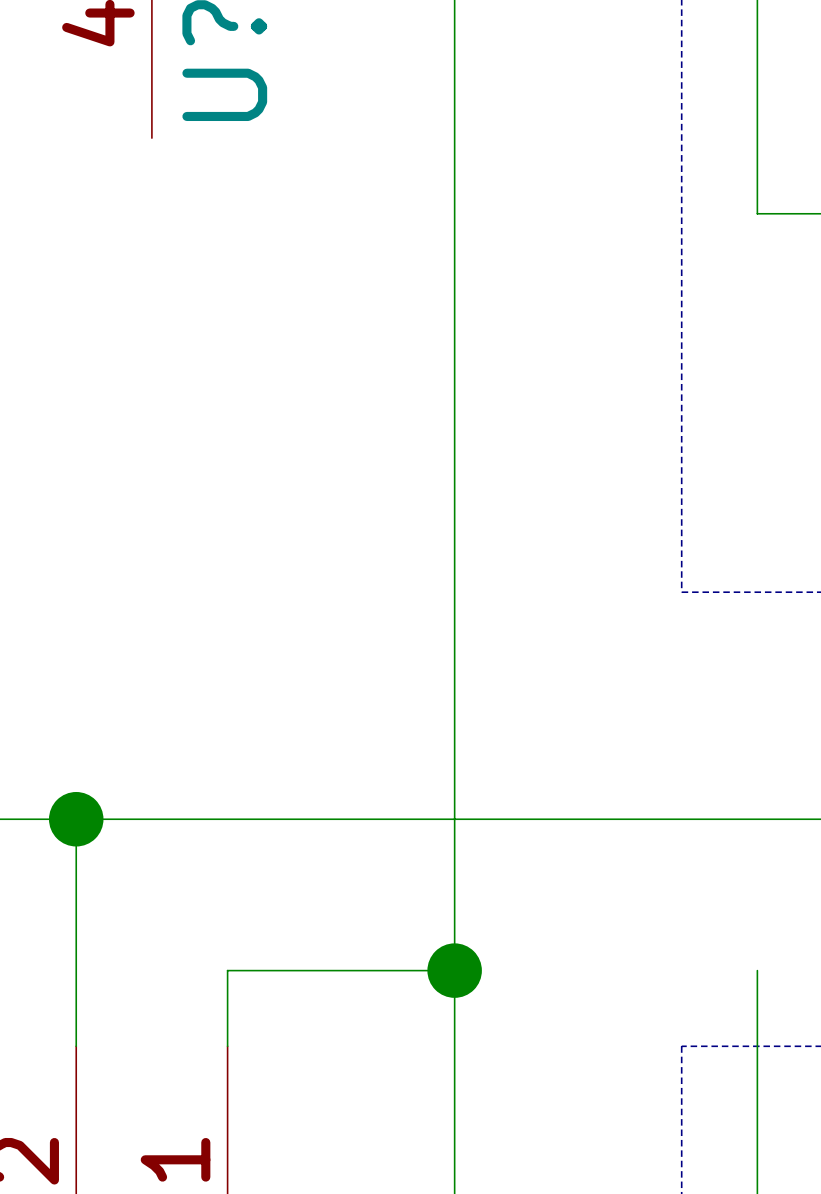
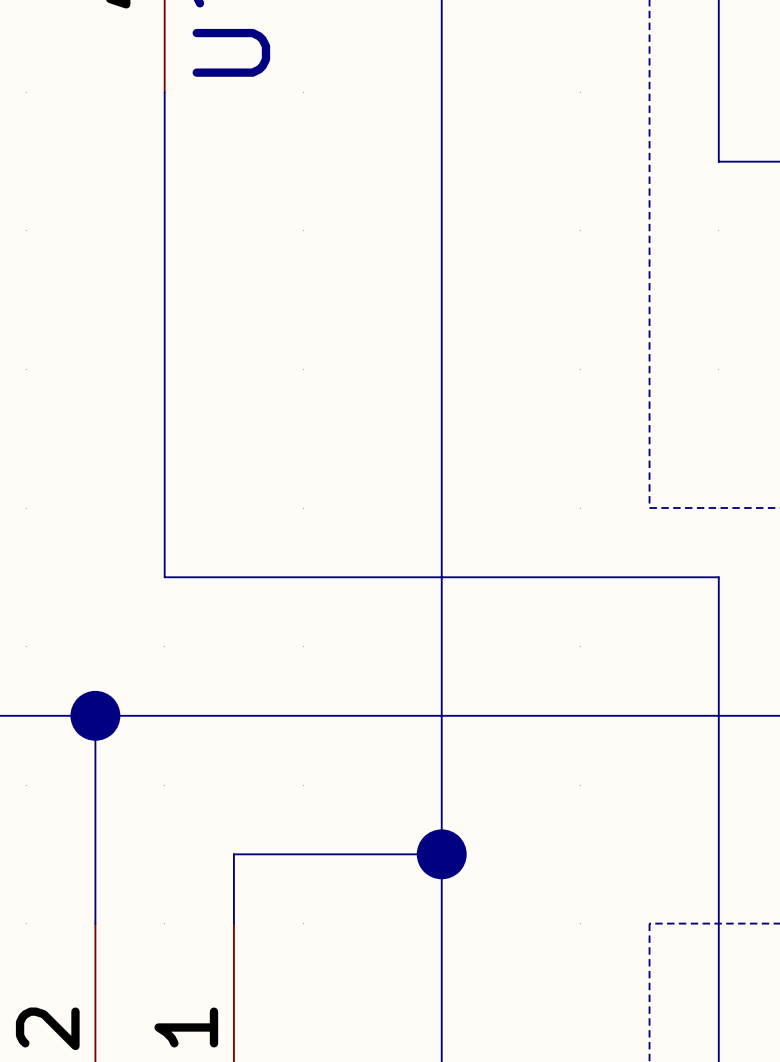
wire: none -> (164, 92) (164, 577) (718, 577) (718, 854)

